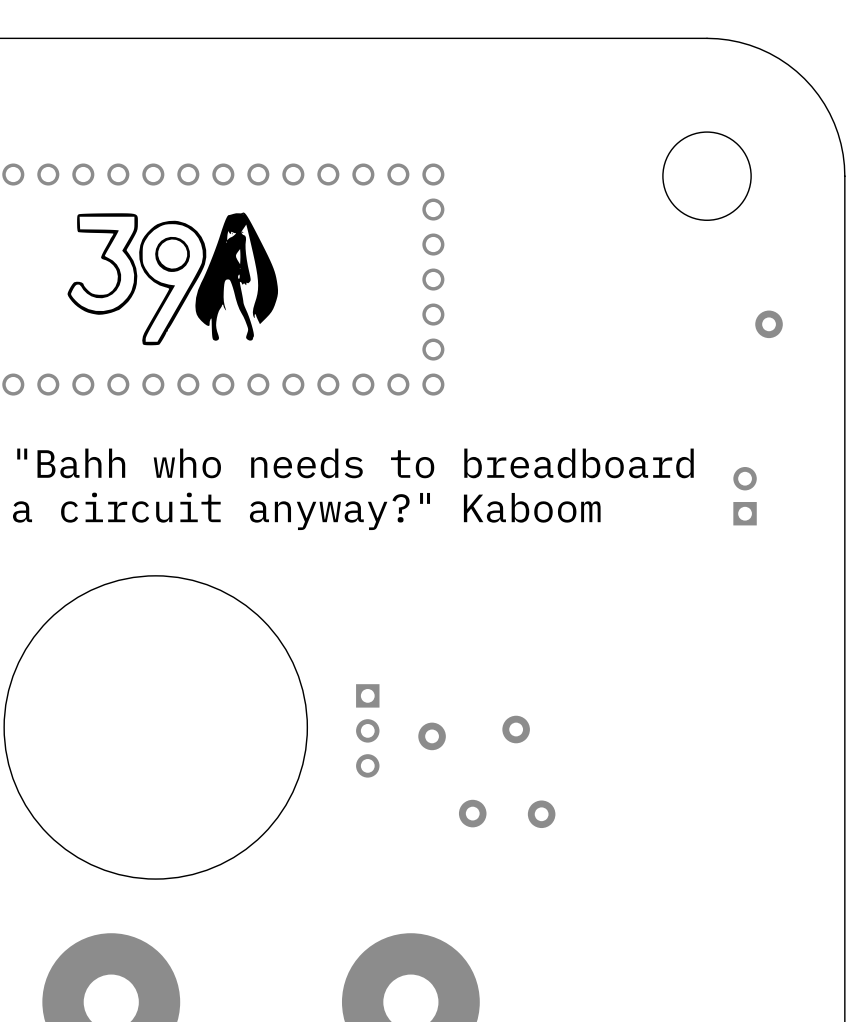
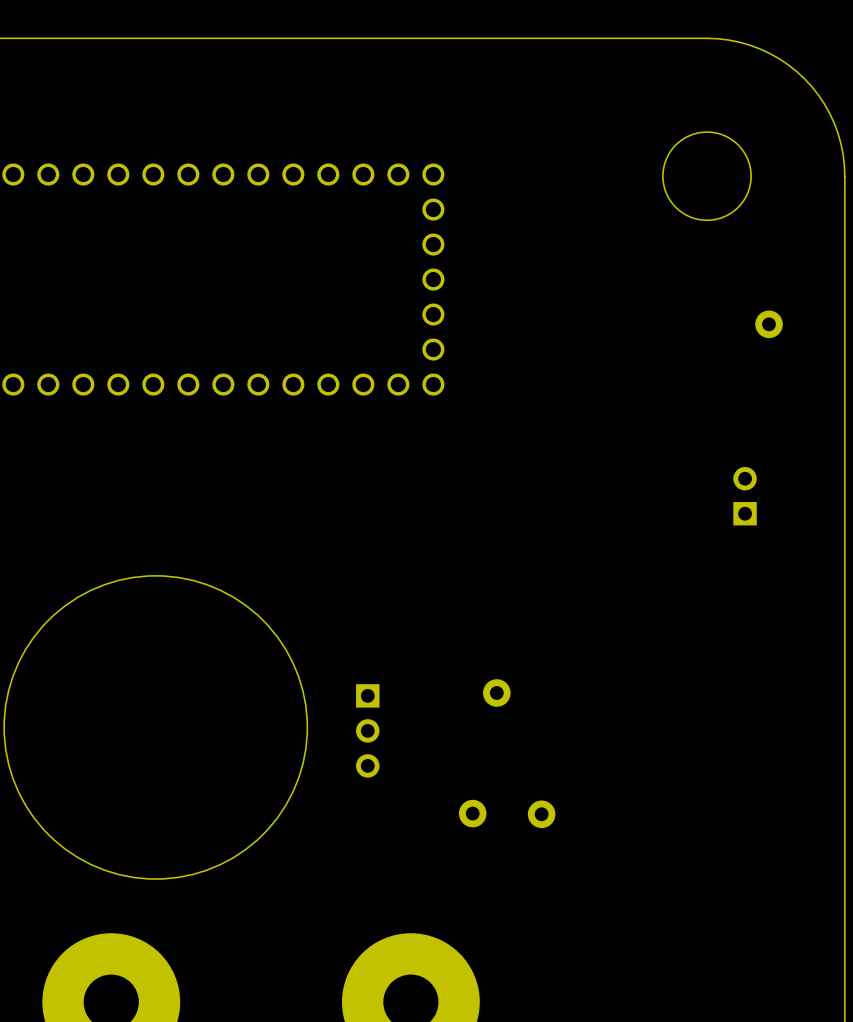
drawing: [67, 212, 279, 346] -> none
text: "Bahh who needs to breadboard (355, 463) -> none
text: a circuit anyway?" Kaboom (306, 511) -> none
part: none -> (496, 692)
part: (516, 729) -> none
part: (432, 736) -> none

